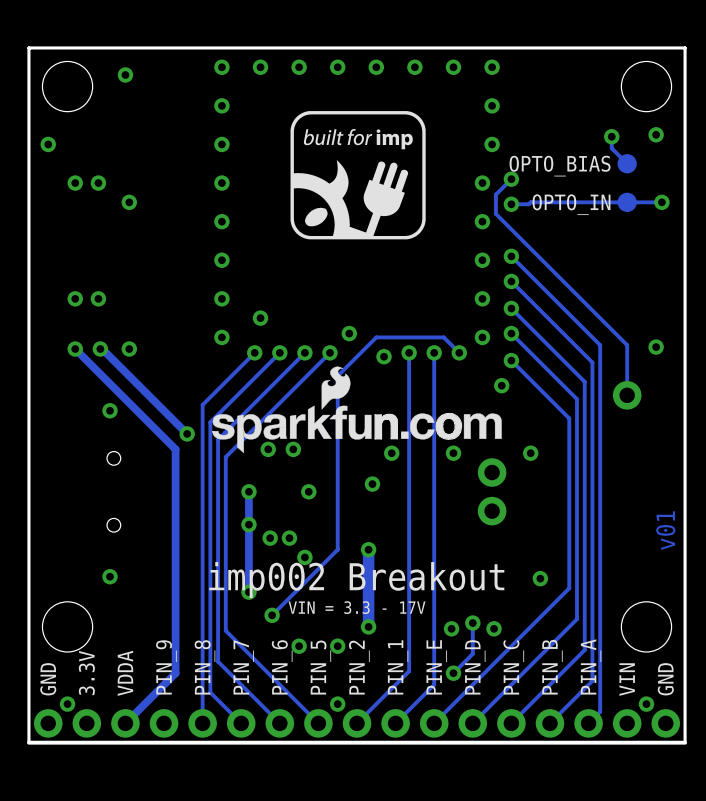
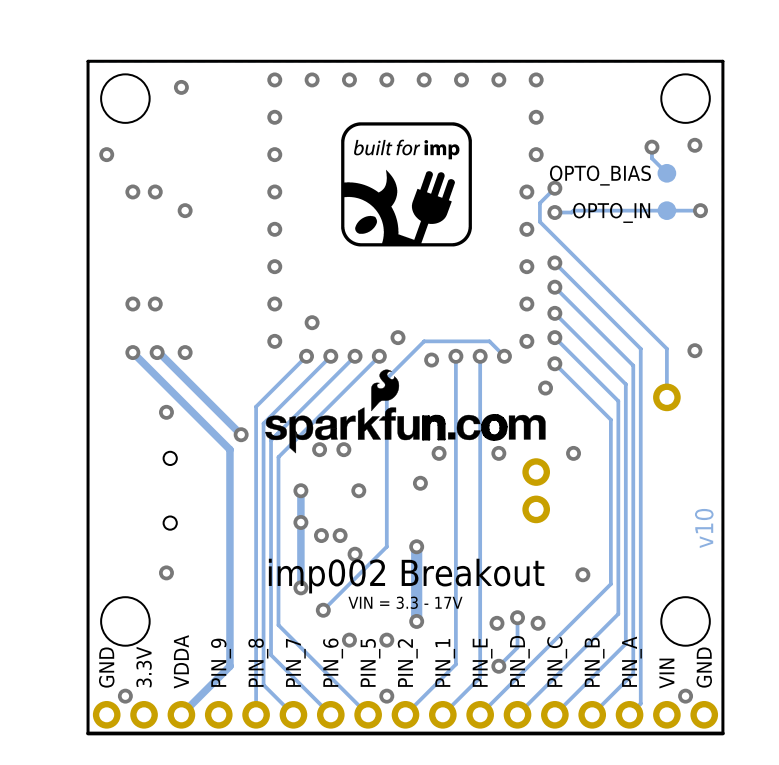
text: v01 (665, 530) -> v10 (704, 528)

